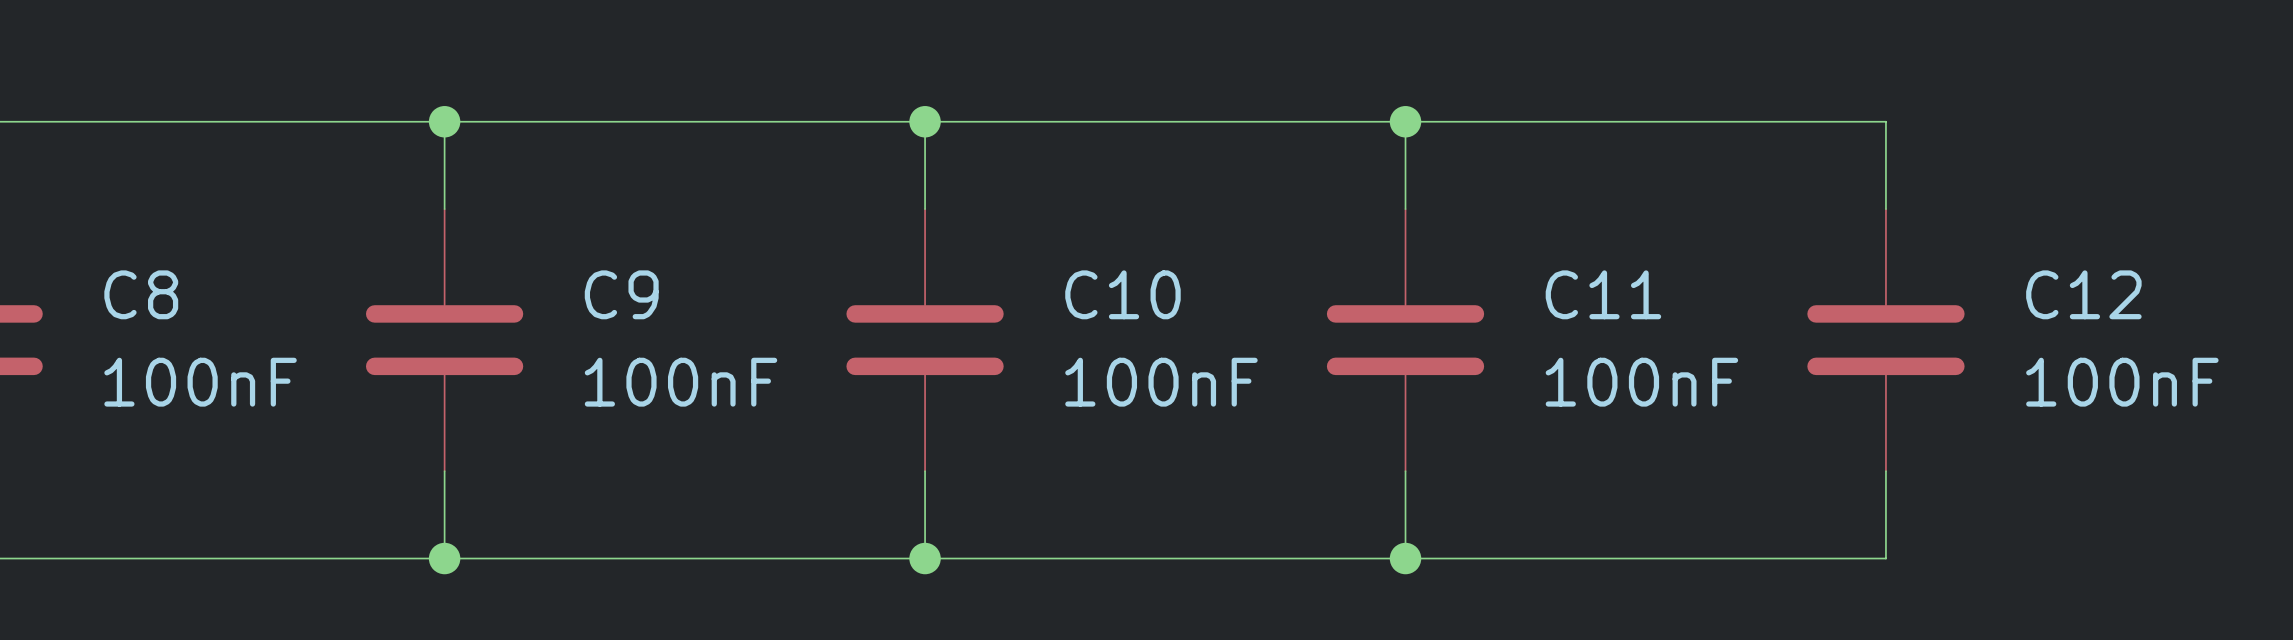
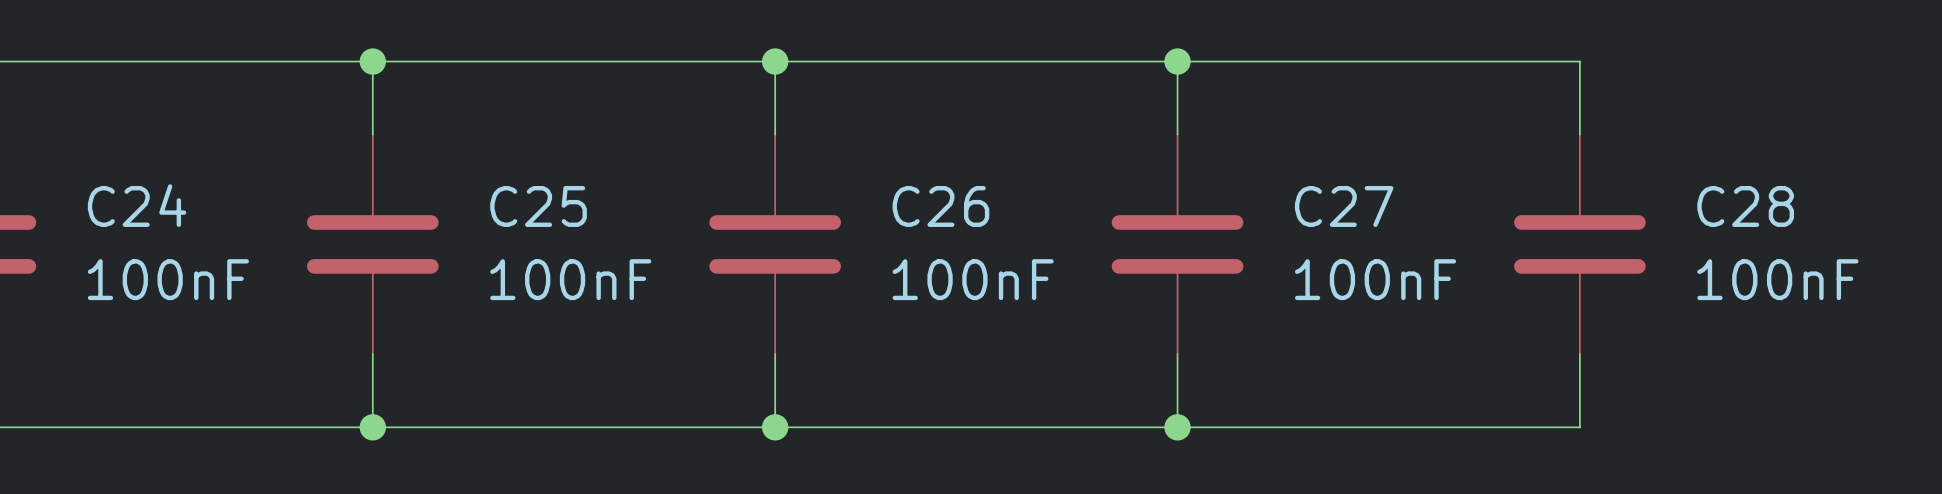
C8 name: C8 (141, 294) -> C24 (137, 205)
C9 name: C9 (621, 294) -> C25 (538, 206)
C10 name: C10 (1122, 294) -> C26 (940, 206)
C11 name: C11 (1603, 294) -> C27 (1344, 206)
C12 name: C12 (2083, 294) -> C28 (1745, 206)

